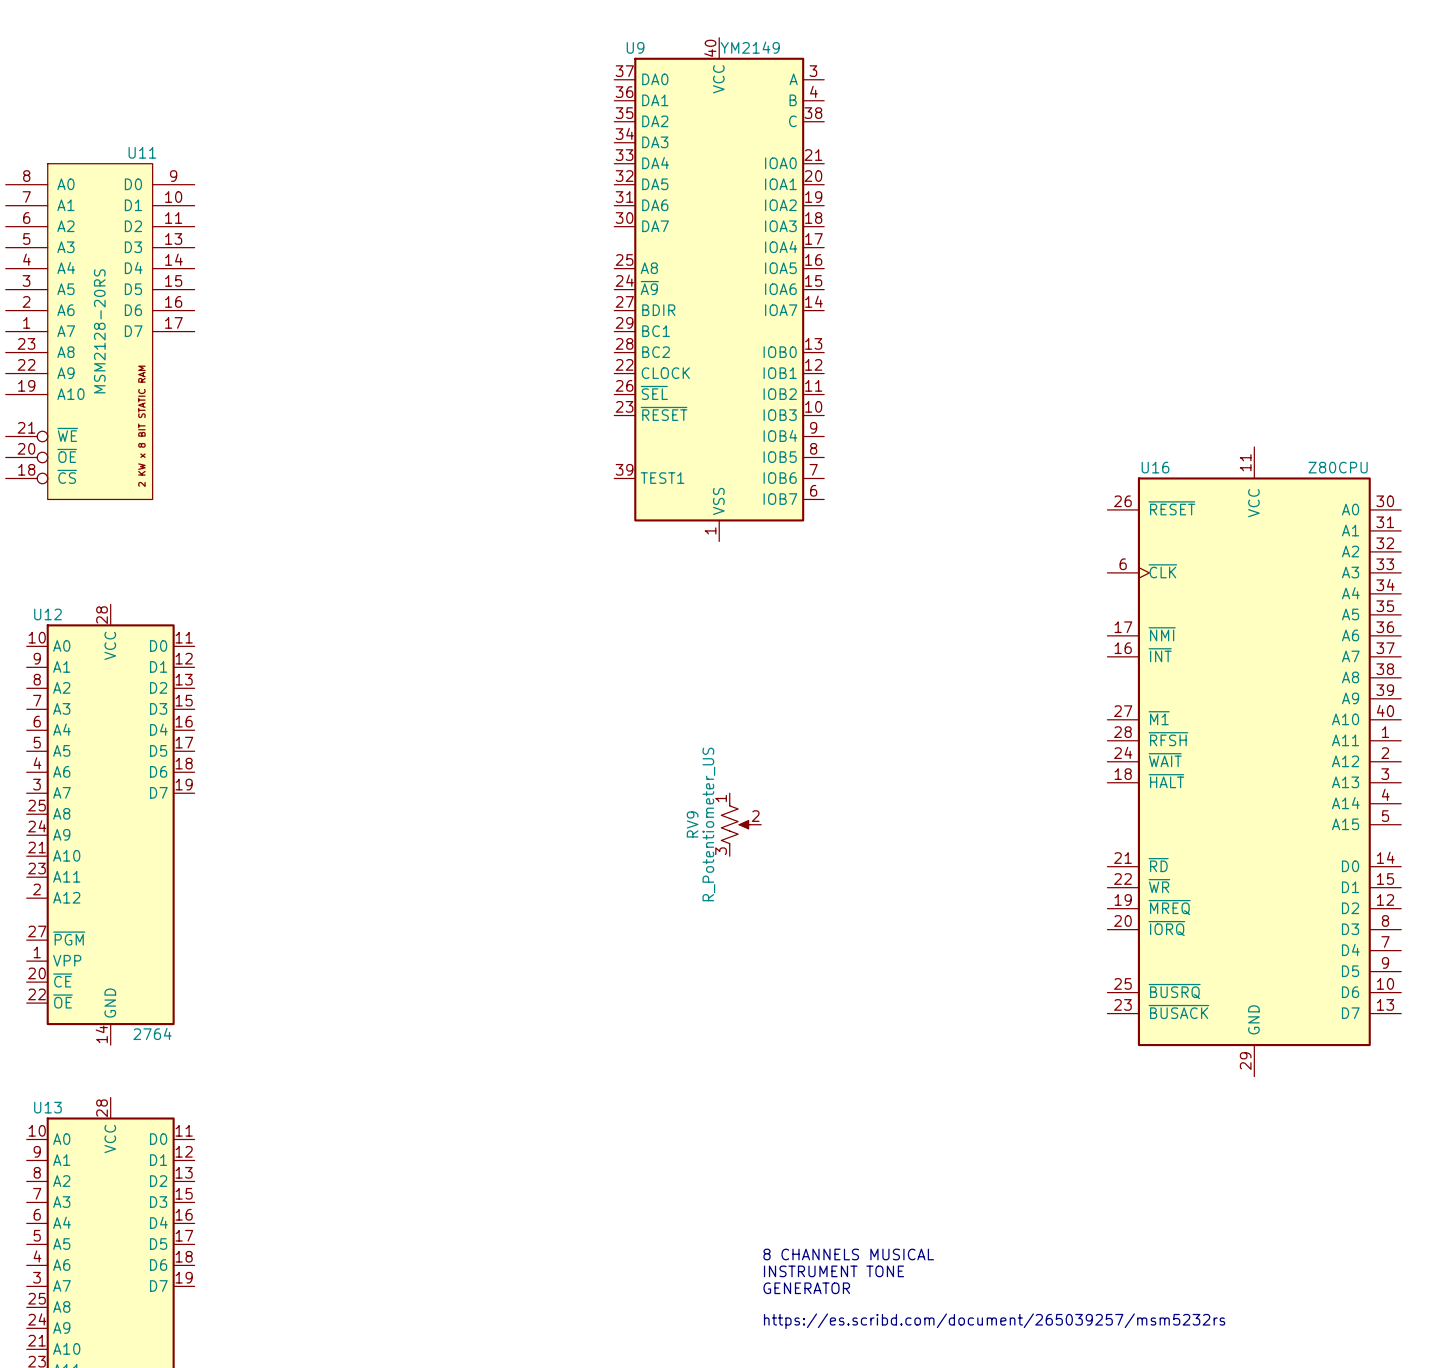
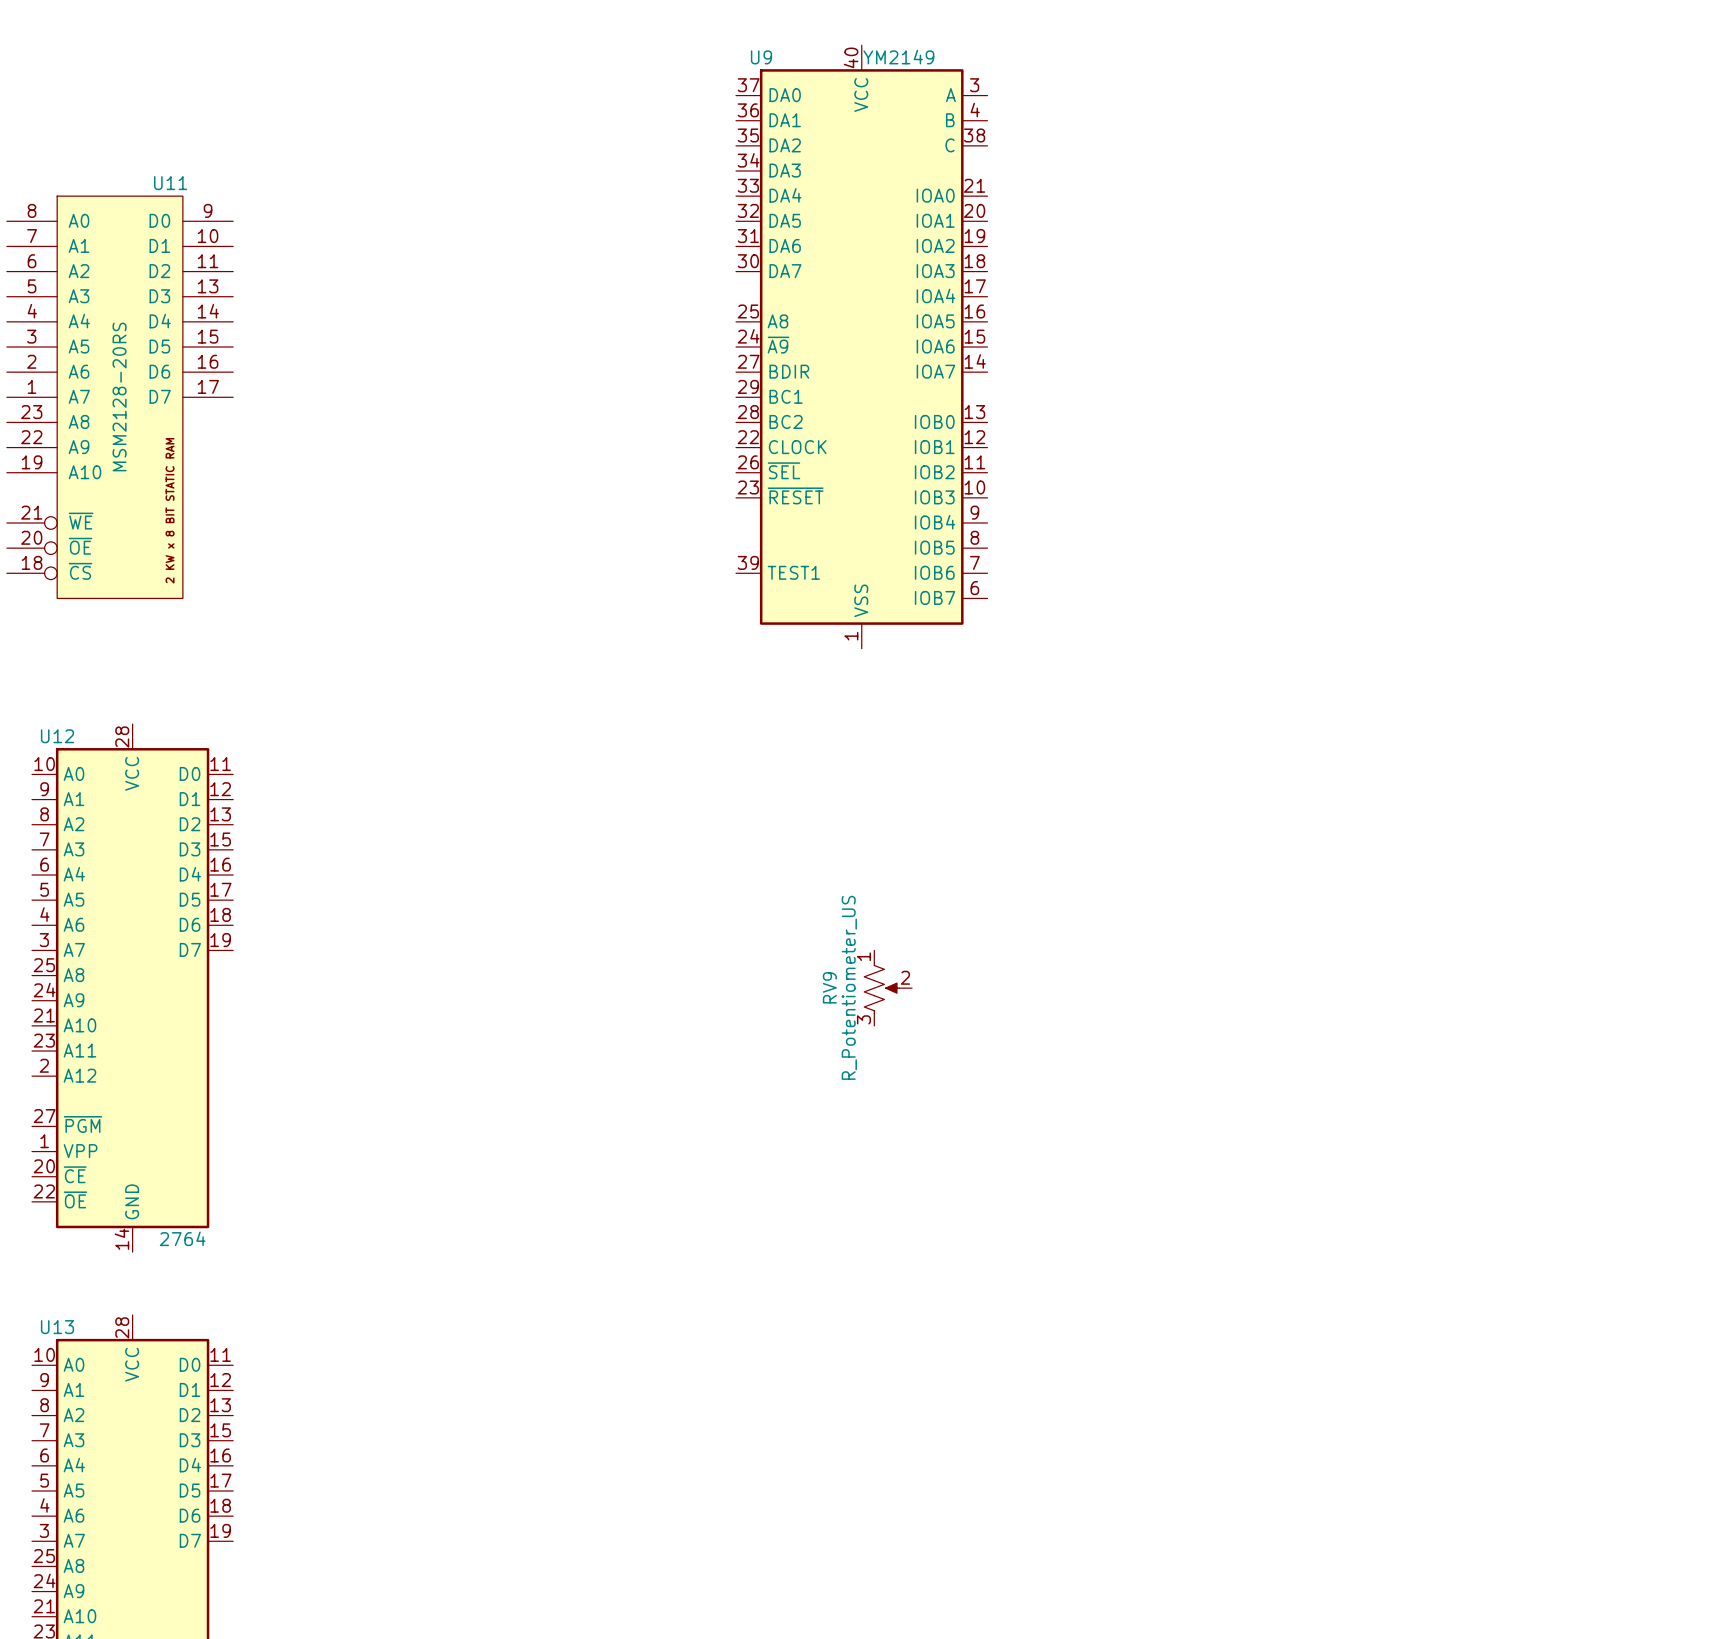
U16: Z80CPU (1254, 761) -> none
text: 8 CHANNELS MUSICAL (848, 1254) -> none
text: INSTRUMENT TONE (833, 1271) -> none
text: GENERATOR (806, 1288) -> none
text: https://es.scribd.com/document/265039257/msm5232rs (994, 1321) -> none

